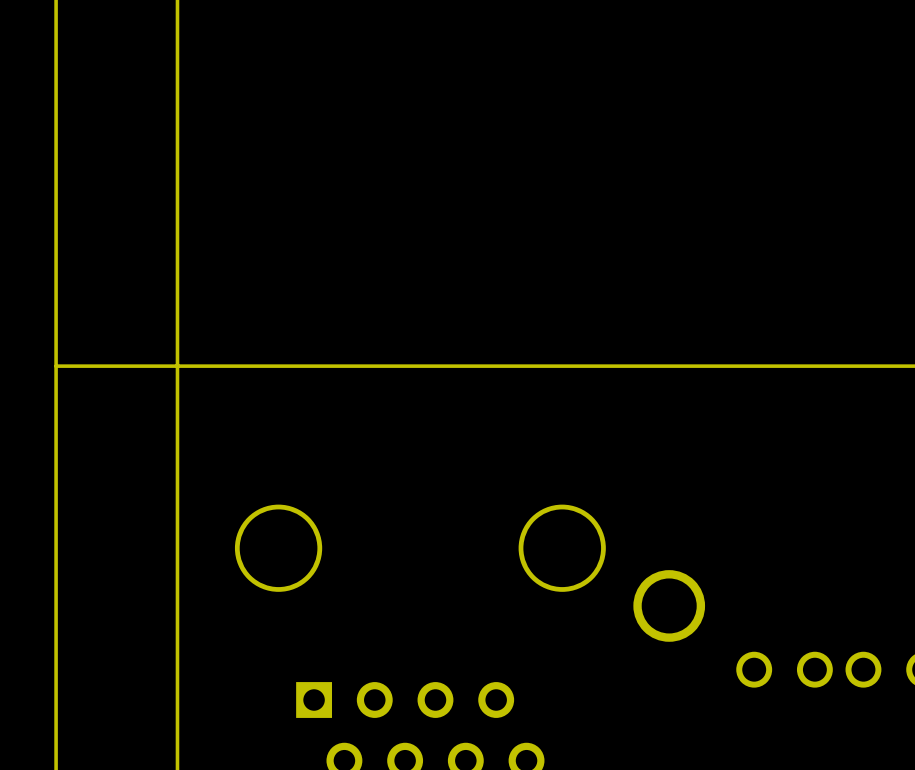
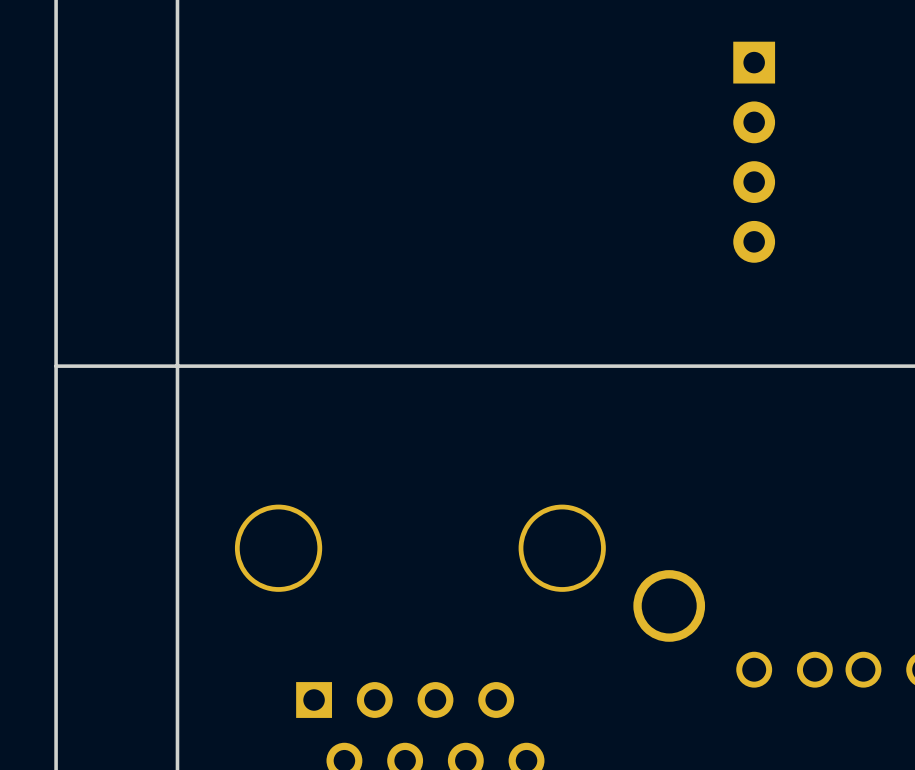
part: none -> (754, 152)

